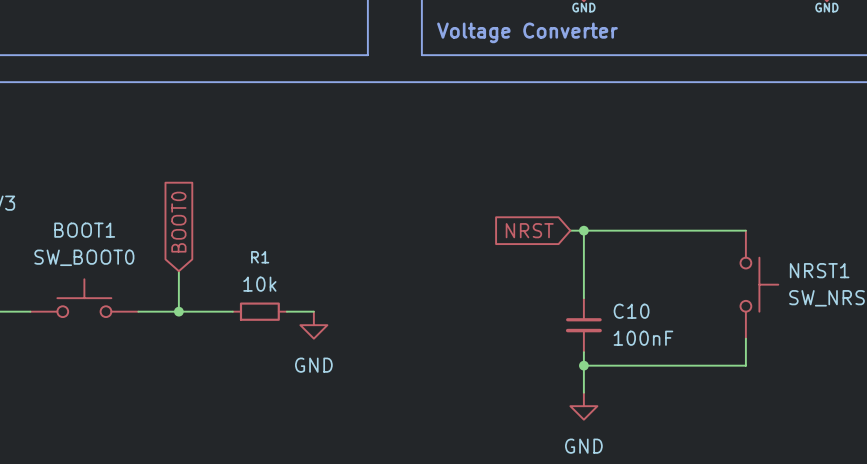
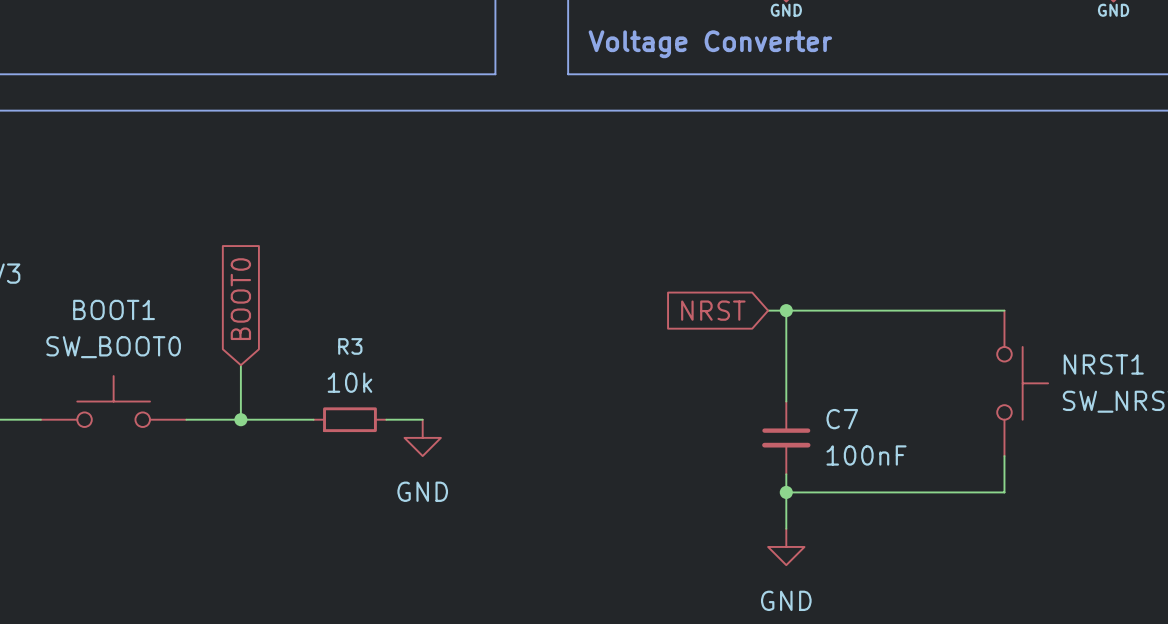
R1 name: R1 (260, 257) -> R3 (350, 346)
C10 name: C10 (631, 311) -> C7 (842, 419)

